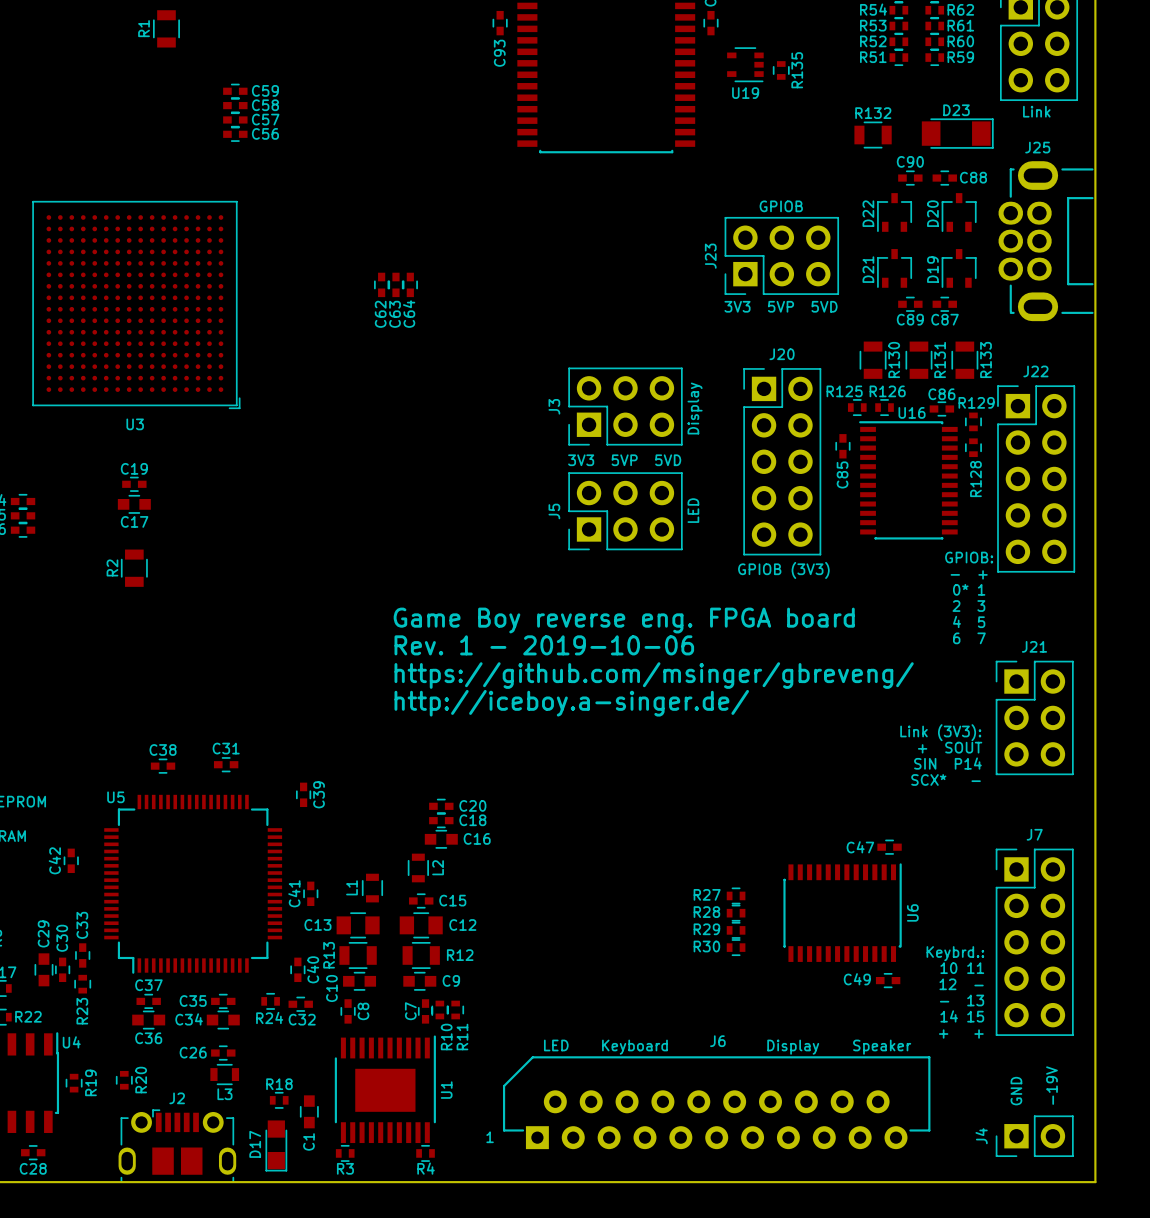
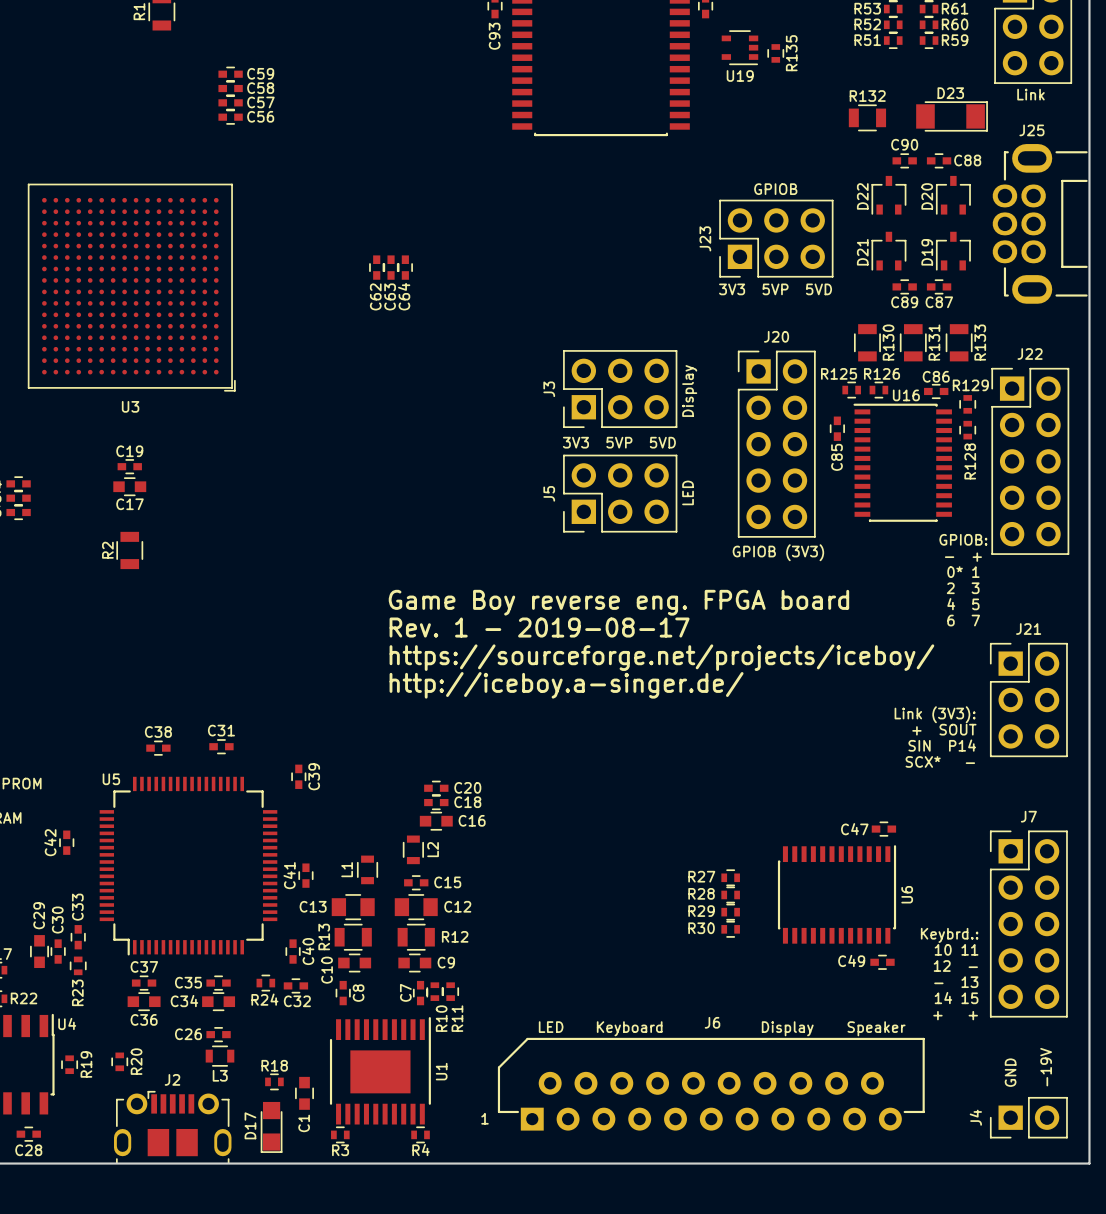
text: Rev. 1 - 2019-10-06 (544, 645) -> Rev. 1 - 2019-08-17 (539, 627)
text: https://github.com/msinger/gbreveng/ (654, 675) -> https://sourceforge.net/projects/iceboy/ (661, 657)

